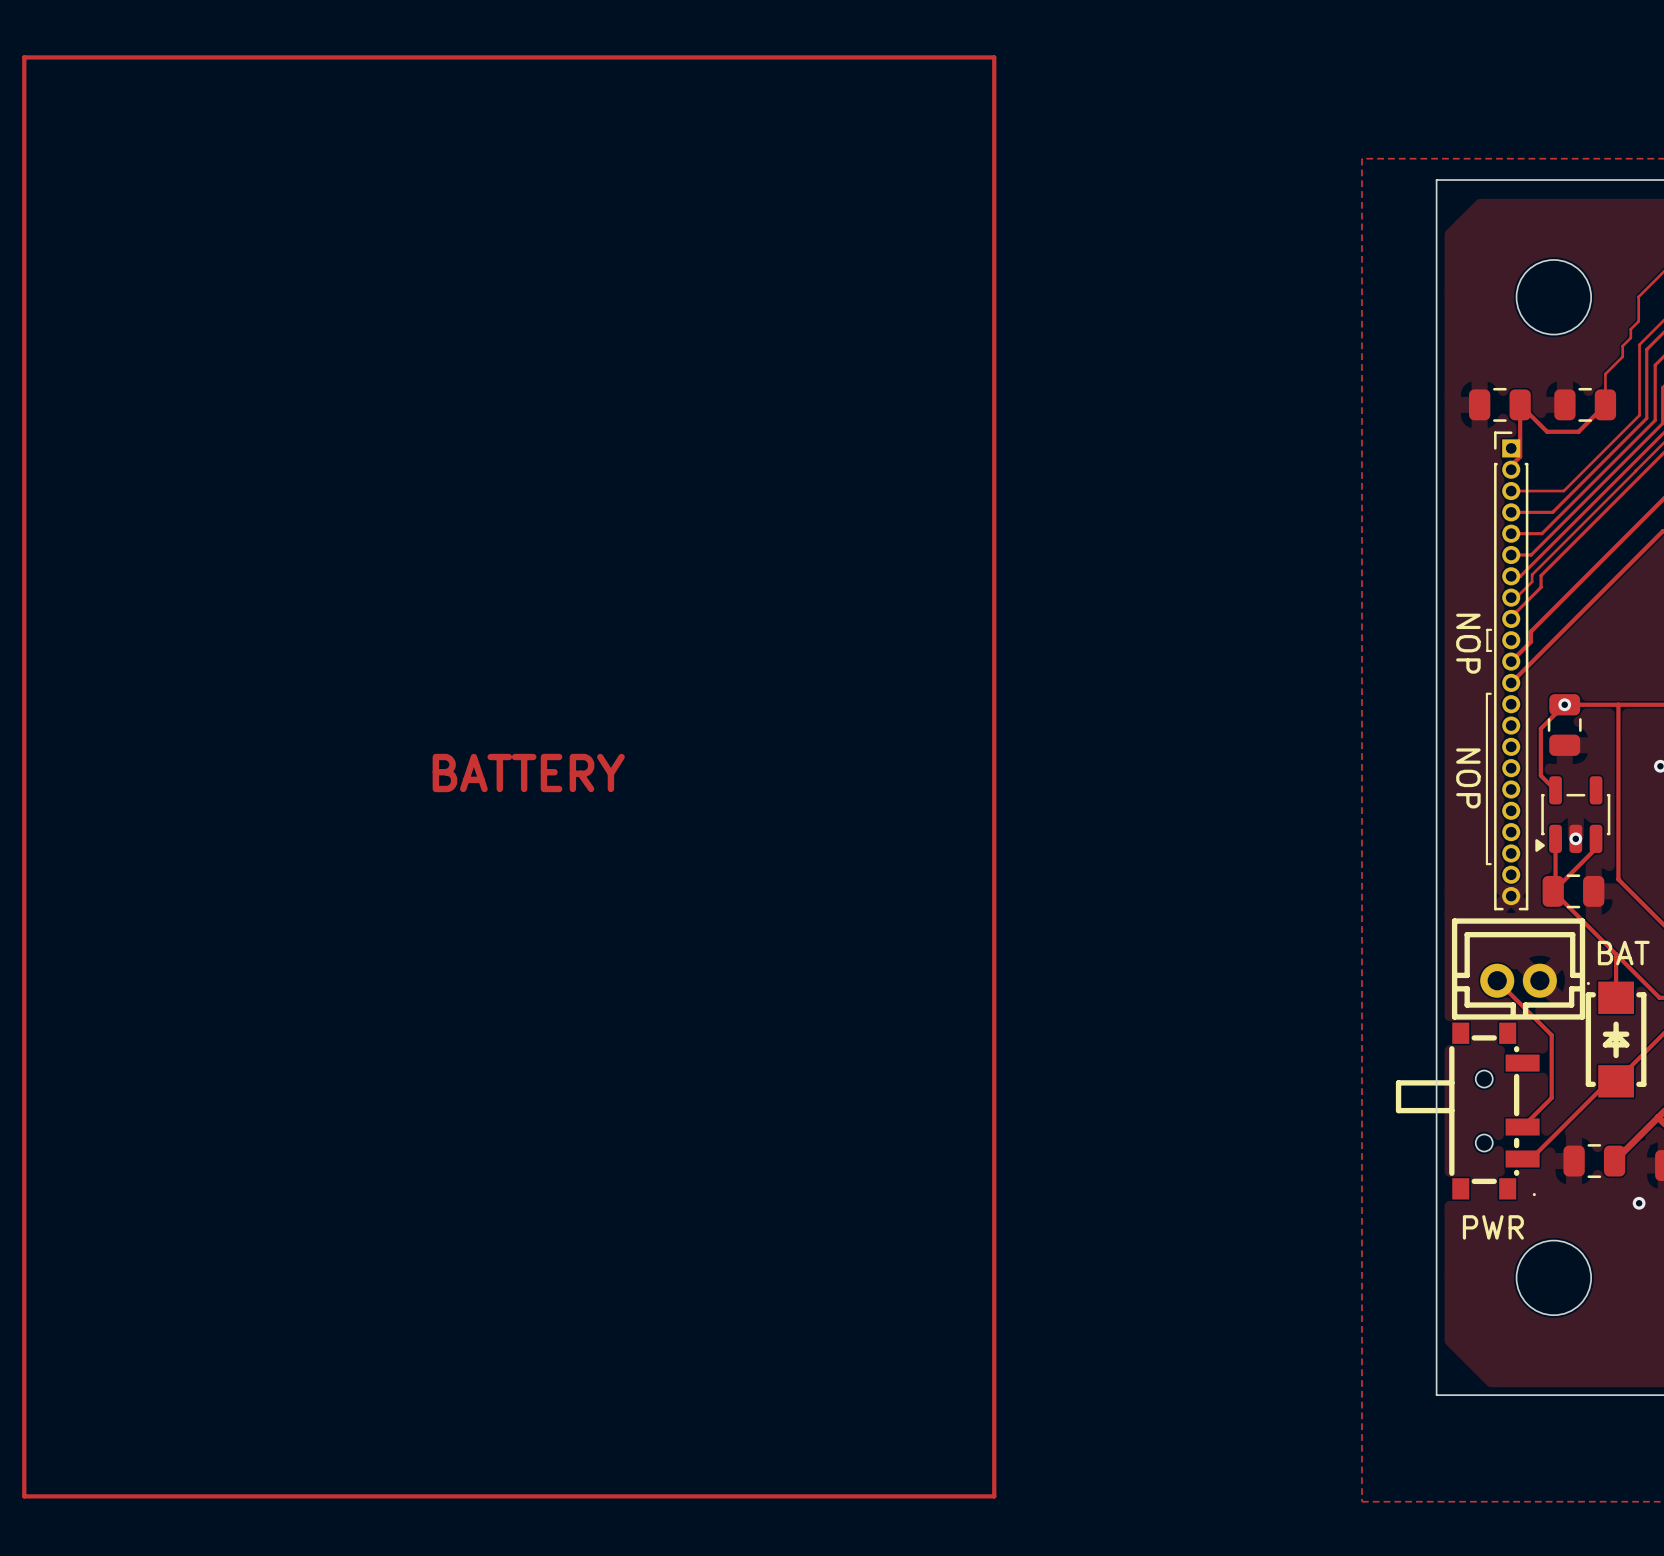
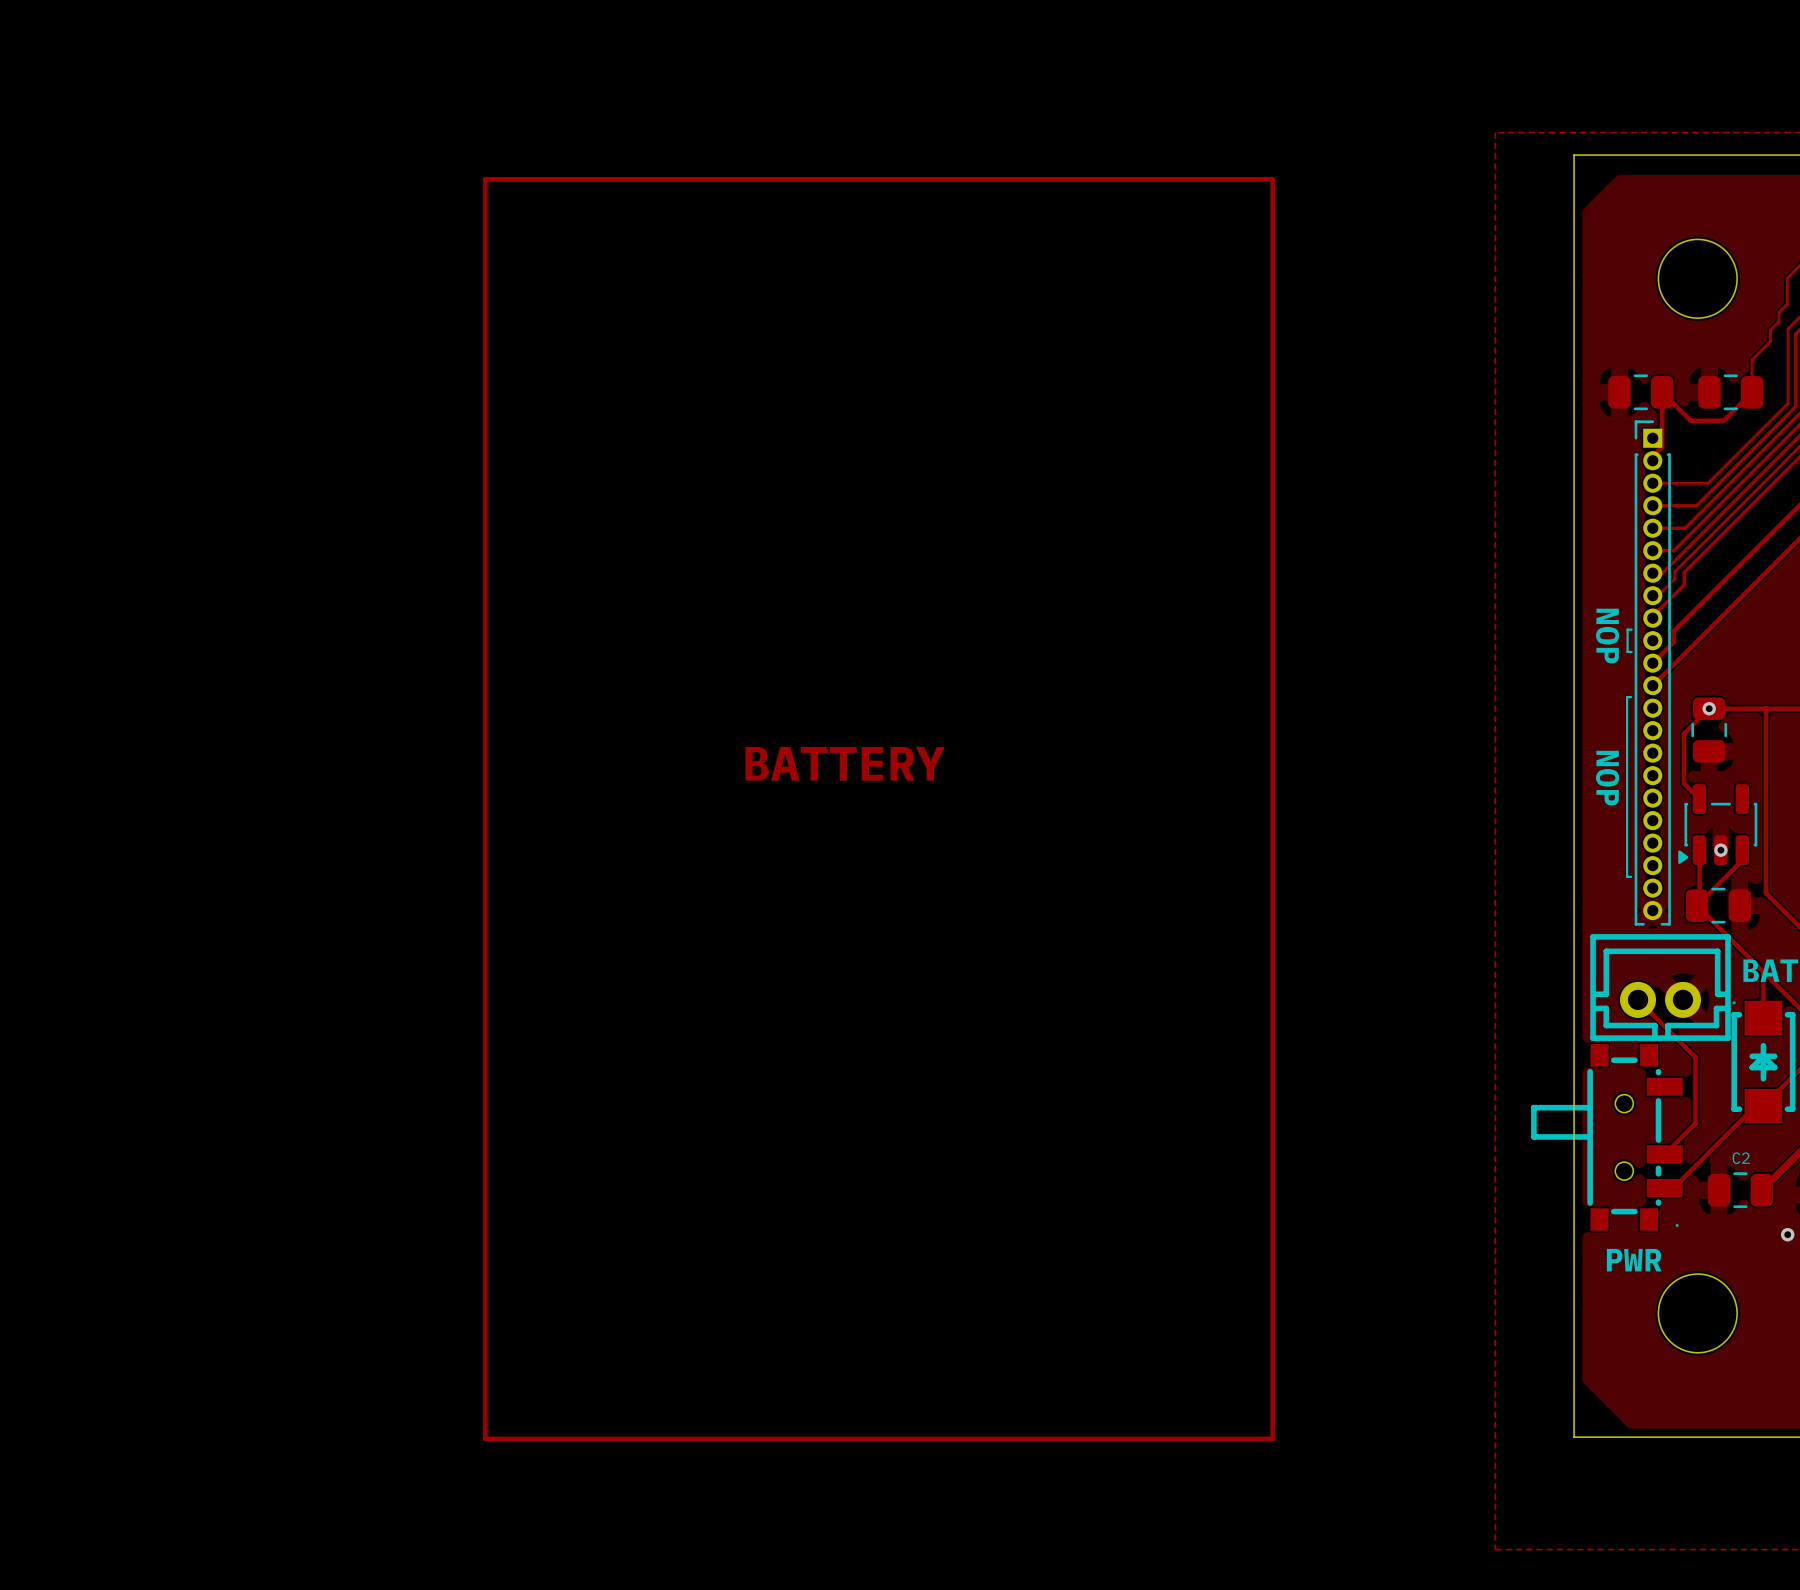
track: (24, 57) (994, 57) (994, 1496) (24, 1496) (24, 57) -> none
track: none -> (485, 179) (1272, 179) (1272, 1438) (485, 1438) (485, 179)
text position: BATTERY (528, 773) -> BATTERY (845, 763)
C2 name: none -> C2 (1741, 1158)

